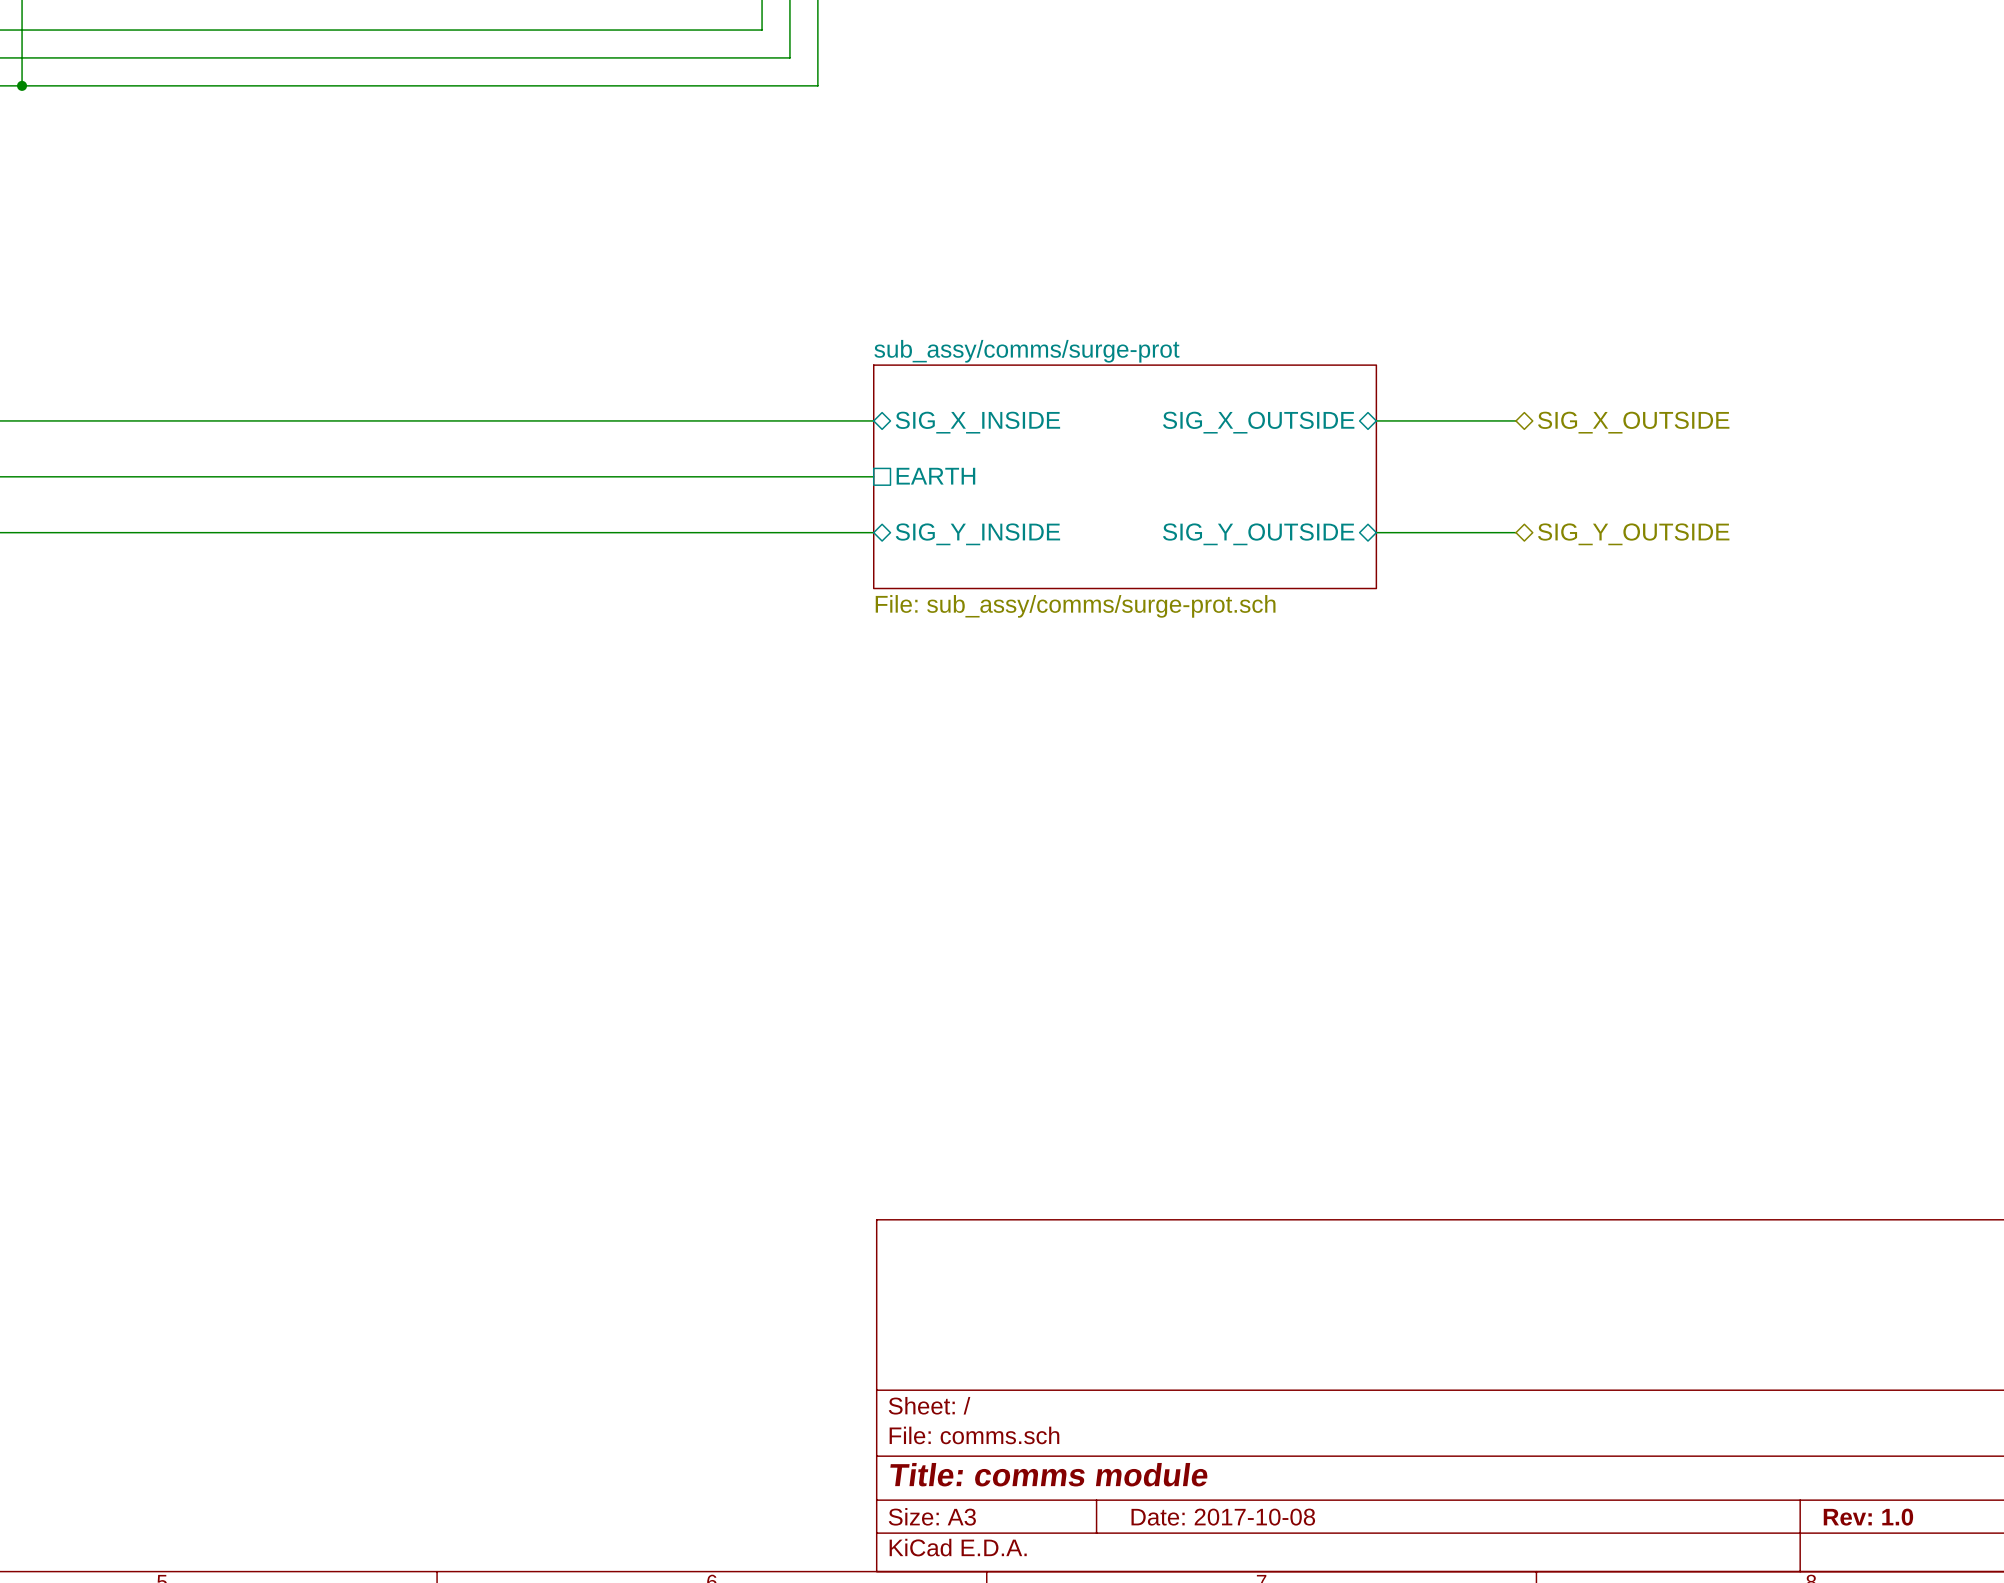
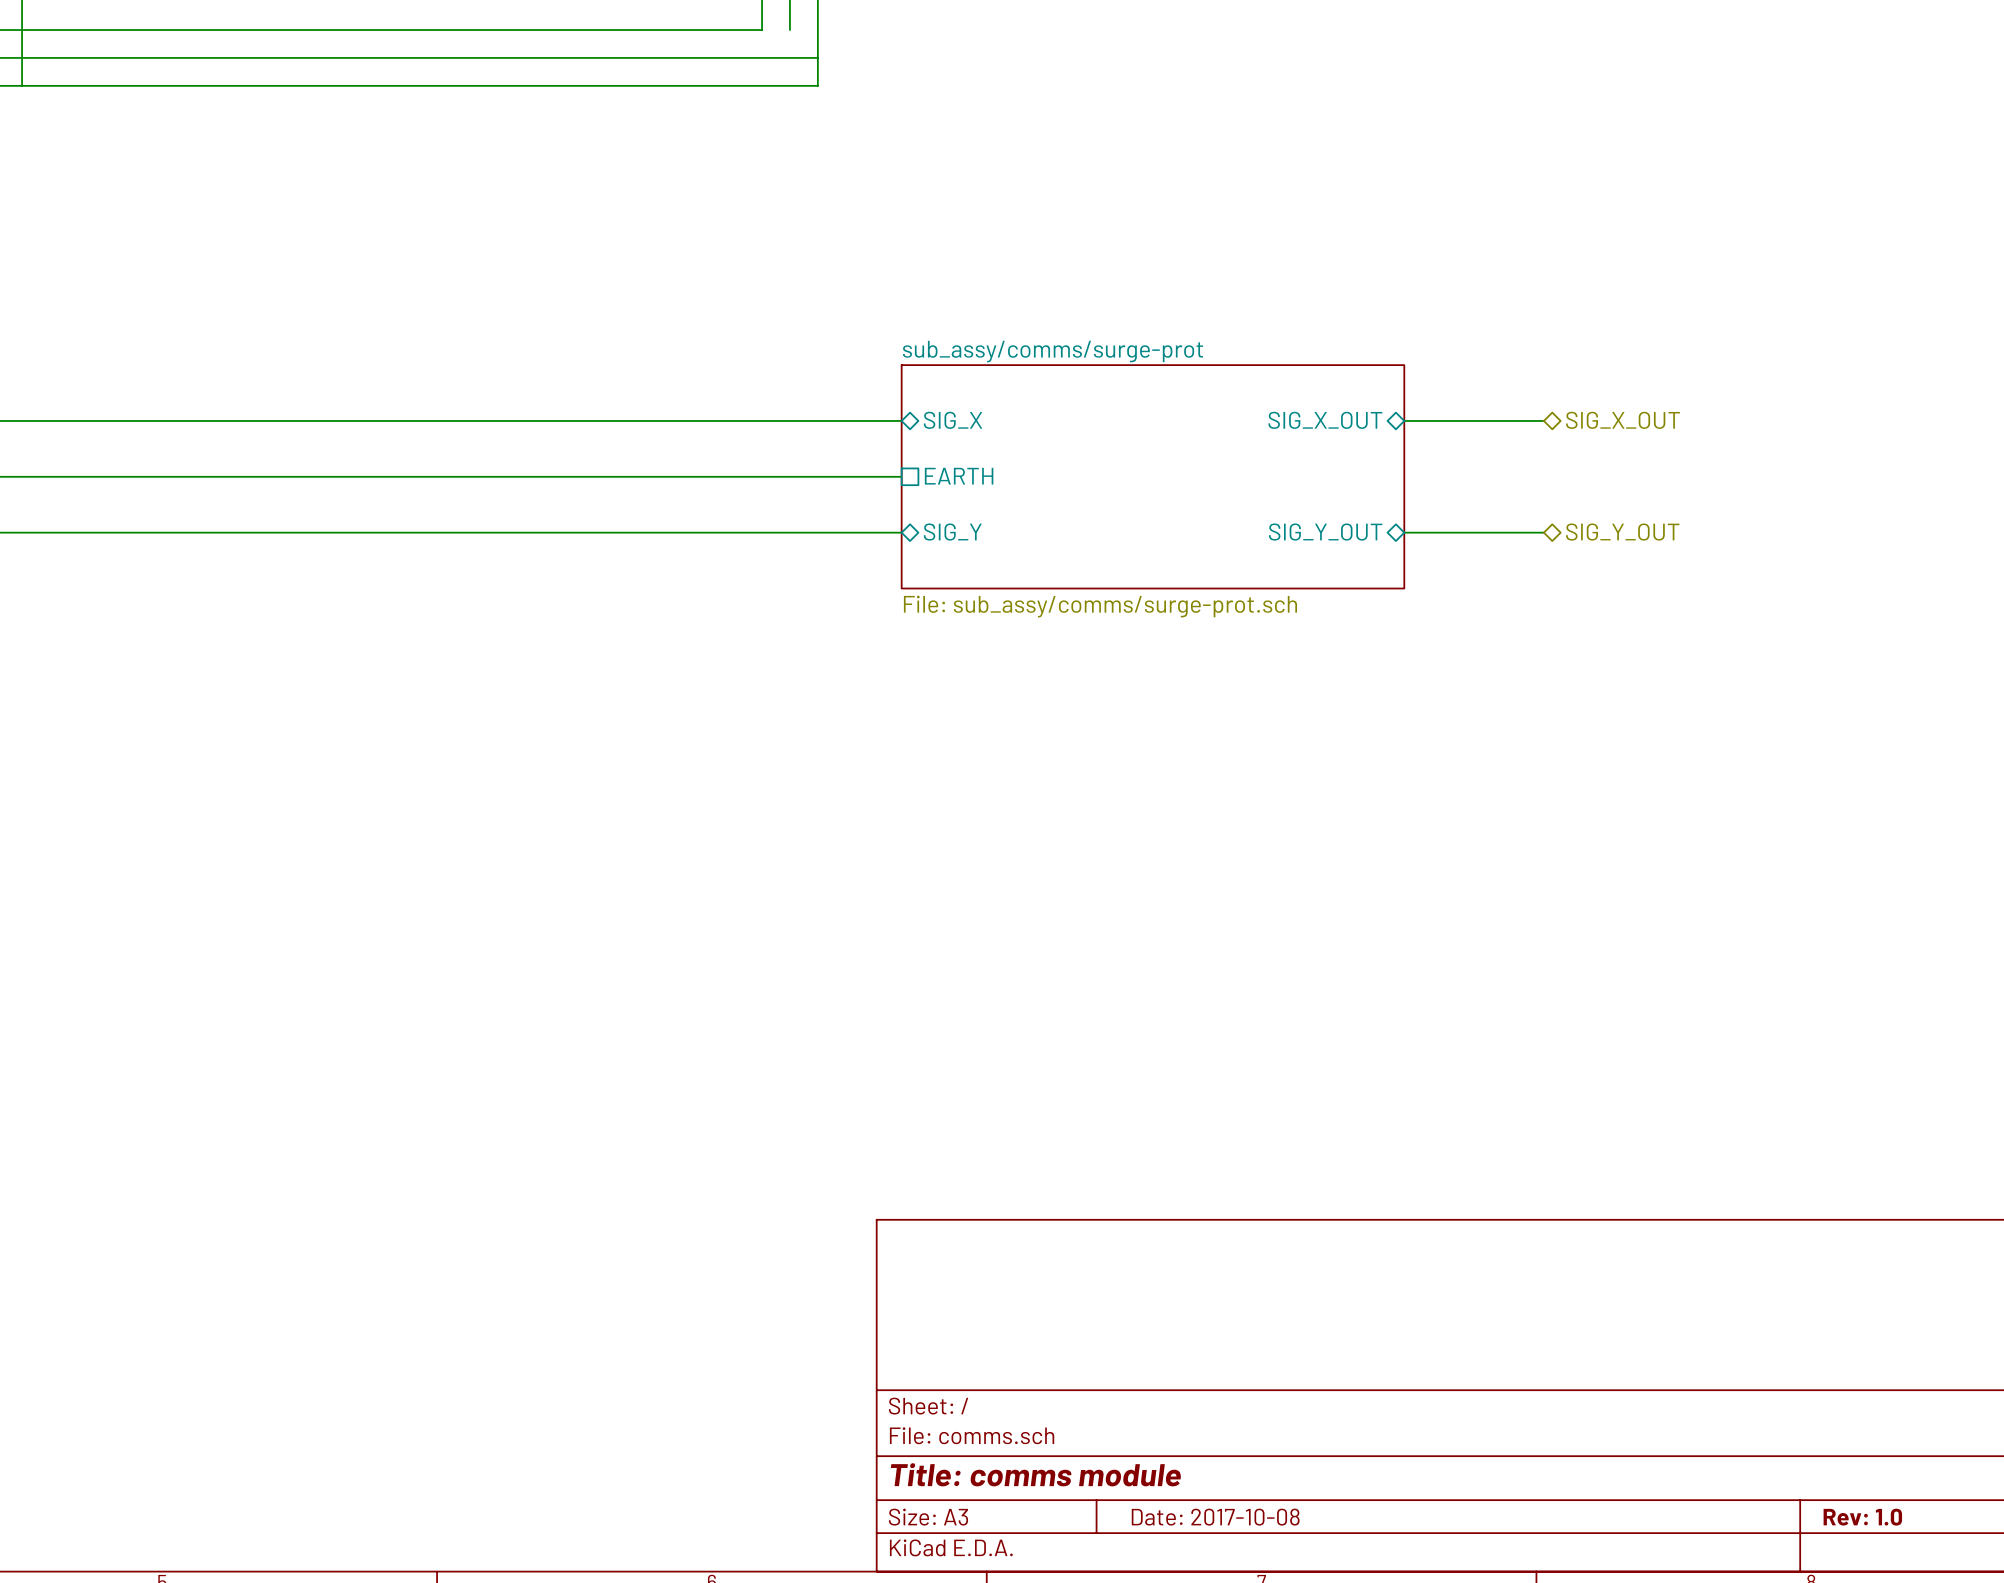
wire: (789, 30) (789, 57) -> (817, 57) (789, 57)
junction: (22, 85) -> none
wire: none -> (873, 420) (901, 420)
wire: (1376, 420) (1404, 420) -> (1515, 420) (1543, 420)
sheet pin: none -> SIG_X (953, 420)
sheet pin: SIG_X_INSIDE (977, 422) -> none
sheet pin: SIG_X_OUTSIDE (1258, 422) -> SIG_X_OUT (1325, 420)
hierarchical label: SIG_X_OUTSIDE (1633, 422) -> SIG_X_OUT (1623, 420)
wire: none -> (873, 476) (901, 476)
sheet pin position: EARTH (935, 476) -> EARTH (959, 476)
sheet sub_assy/comms/surge-prot position: (1125, 476) -> (1152, 476)
wire: none -> (873, 532) (901, 532)
wire: (1376, 532) (1404, 532) -> (1515, 532) (1543, 532)
sheet pin: none -> SIG_Y (952, 532)
sheet pin: SIG_Y_INSIDE (977, 534) -> none
sheet pin: SIG_Y_OUTSIDE (1258, 534) -> SIG_Y_OUT (1325, 532)
hierarchical label: SIG_Y_OUTSIDE (1633, 534) -> SIG_Y_OUT (1622, 532)

